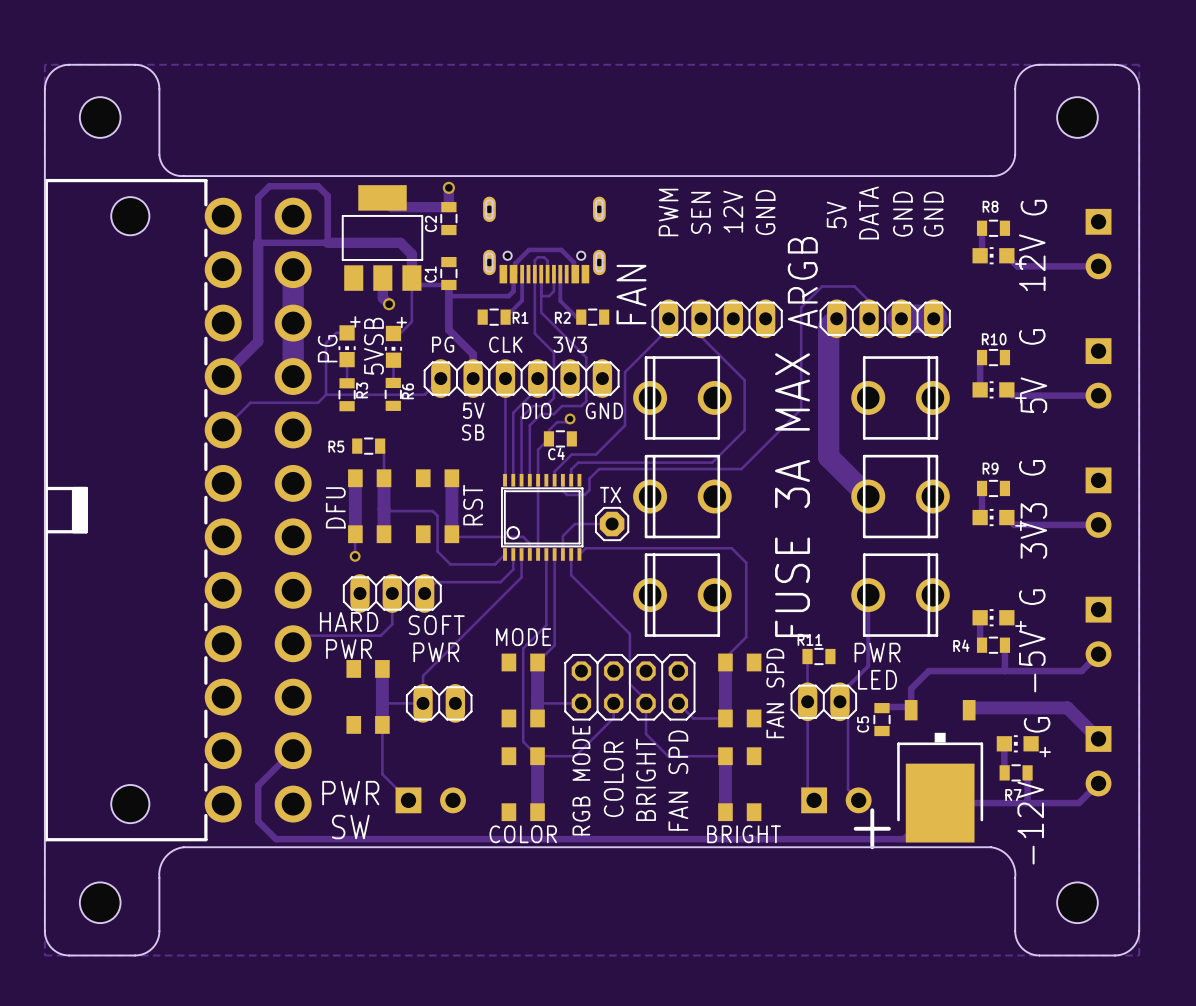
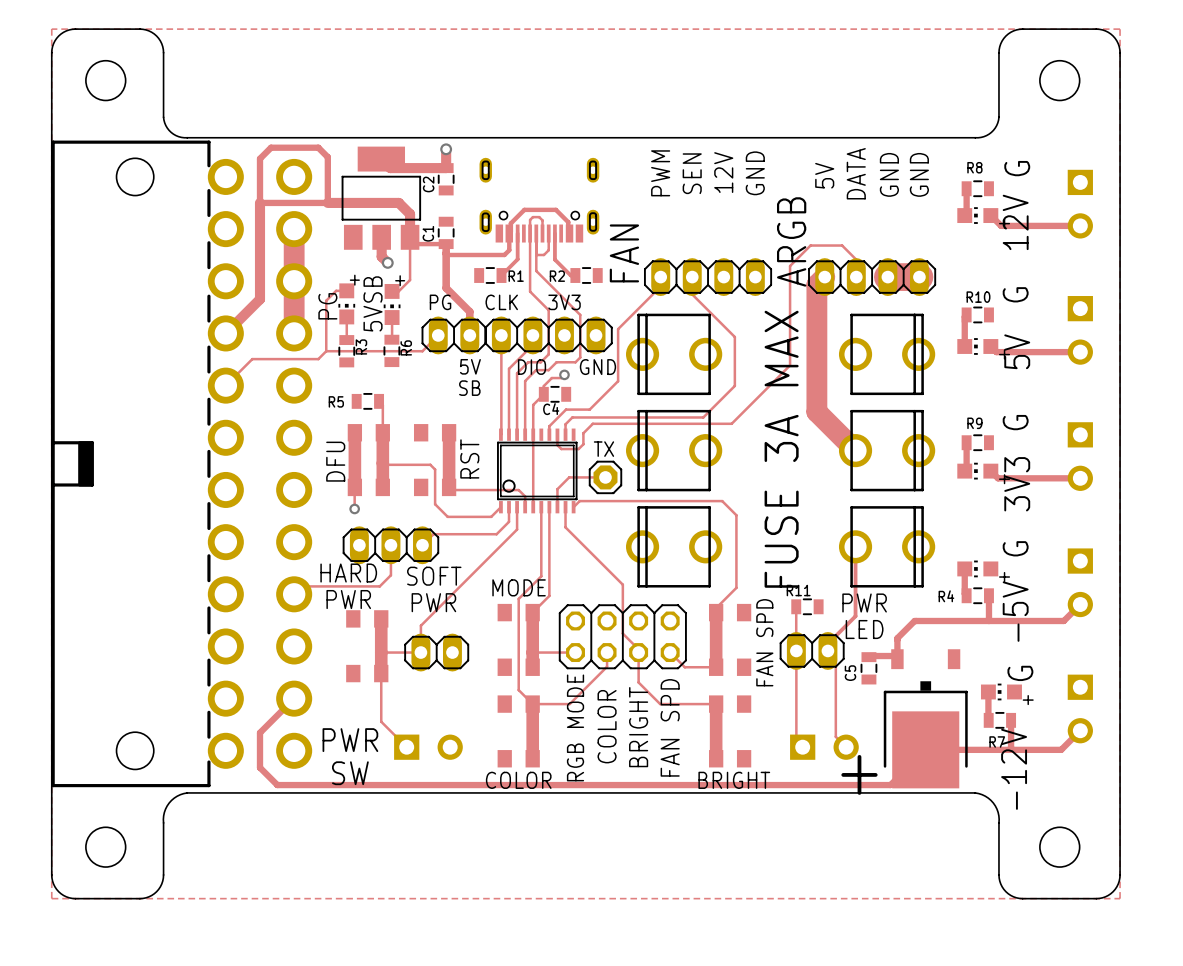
track: (969, 710) (971, 707) (1067, 707) (1098, 738) -> none

